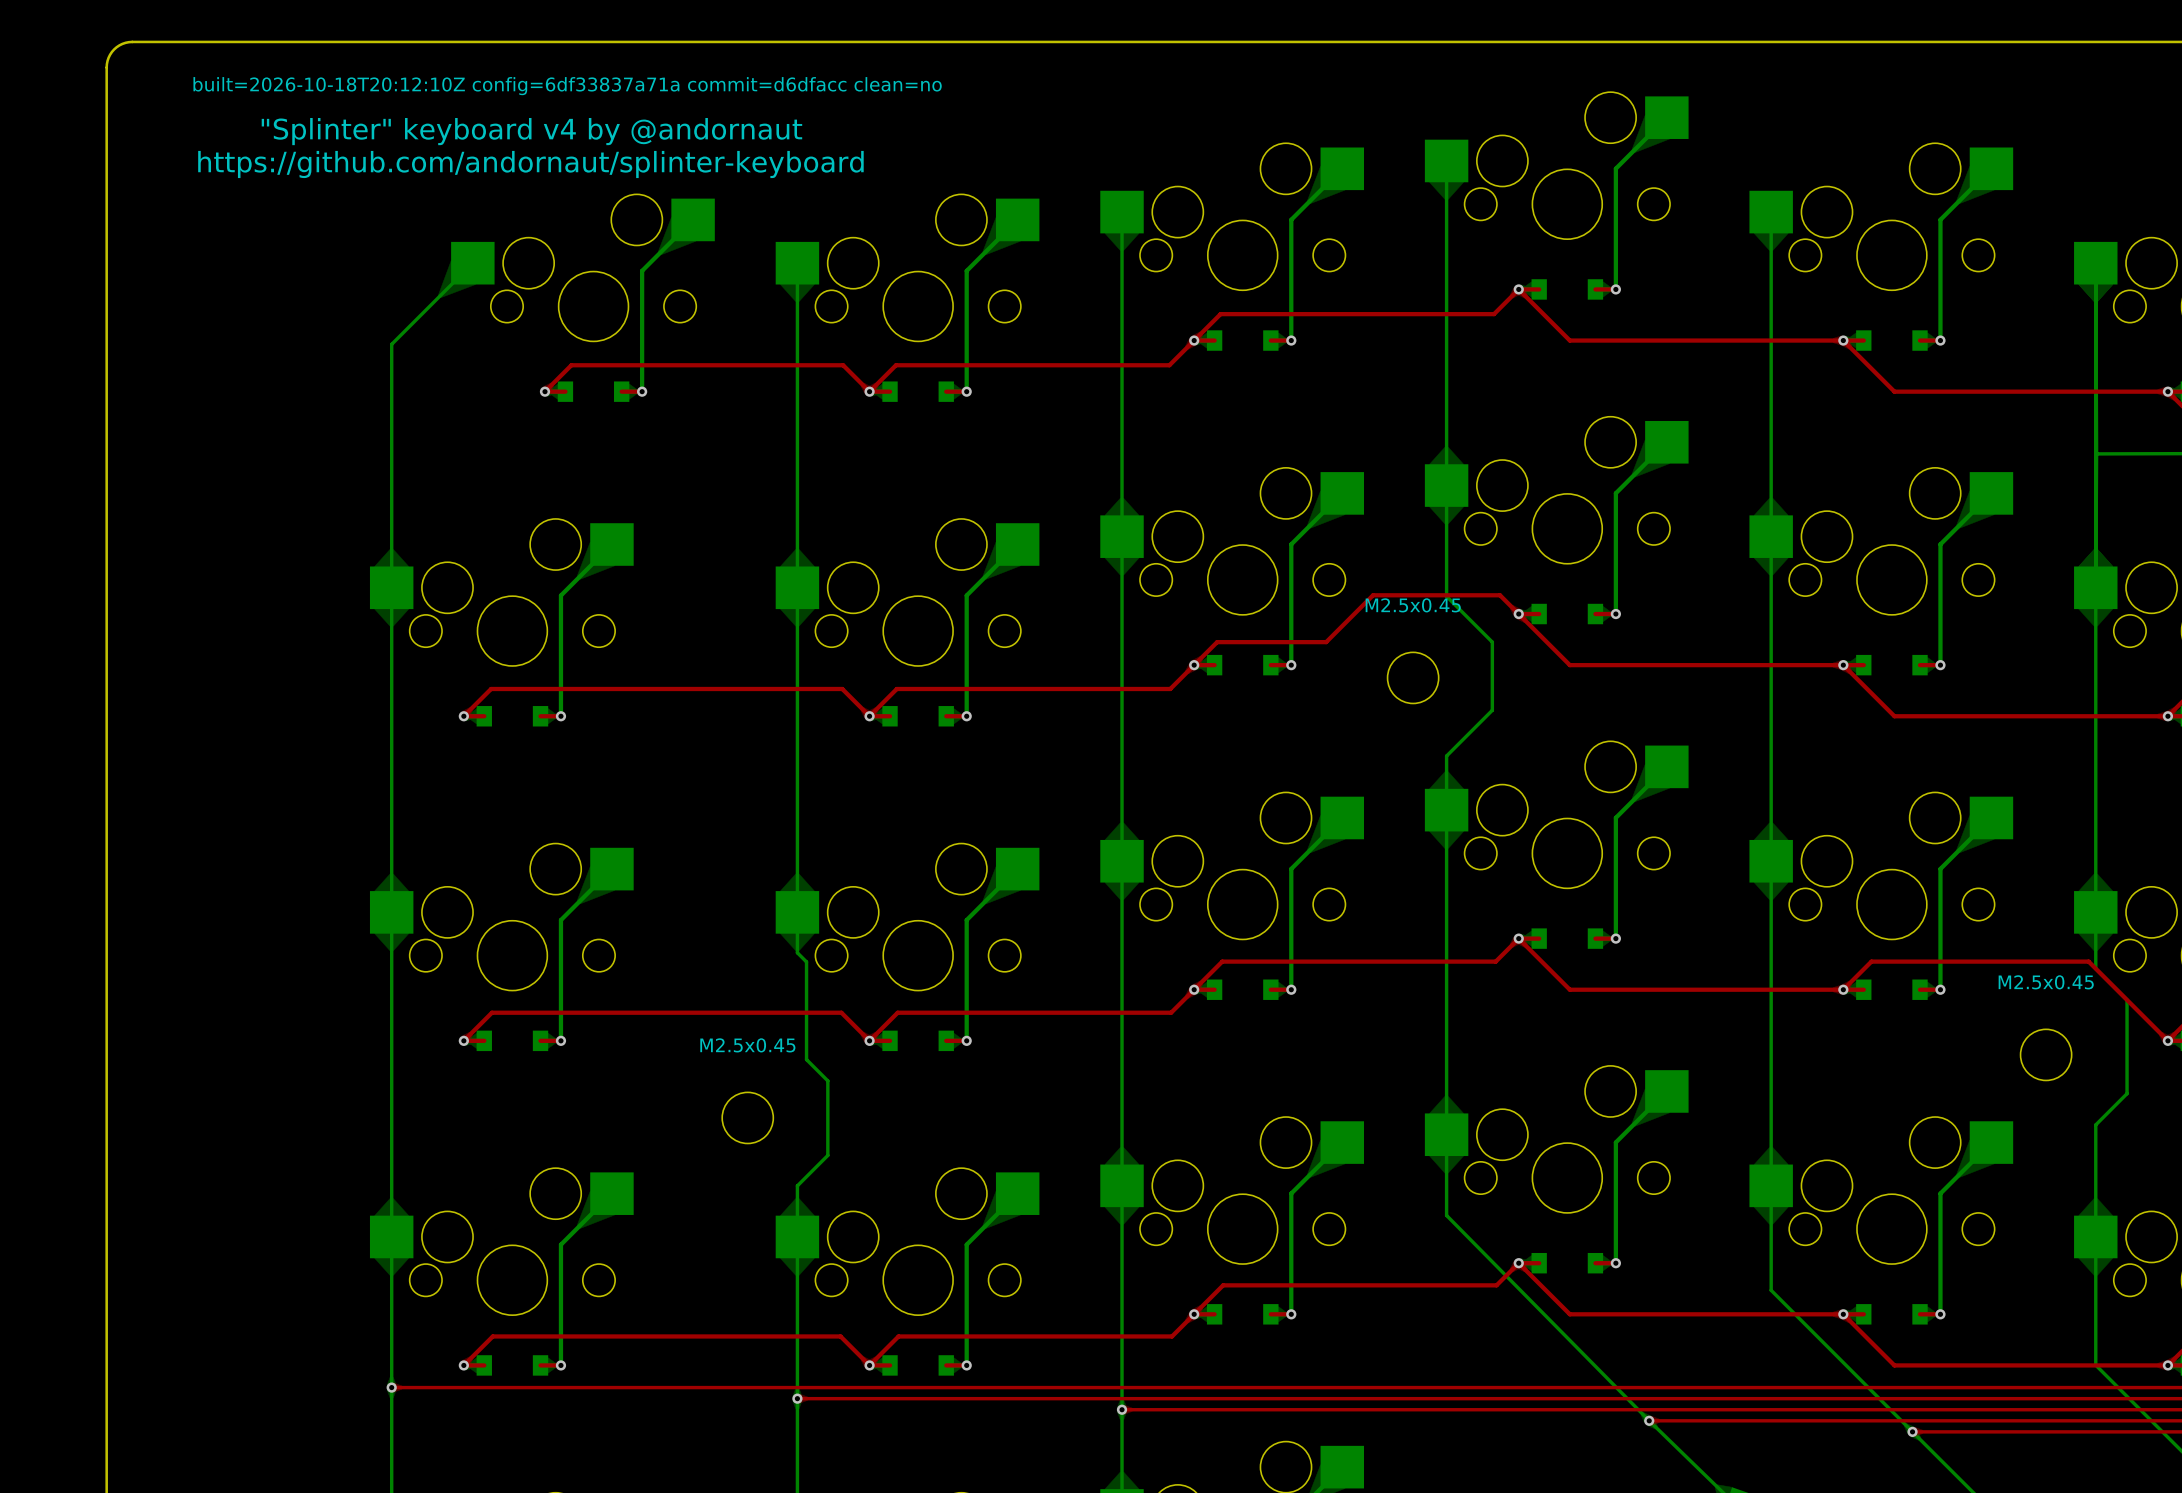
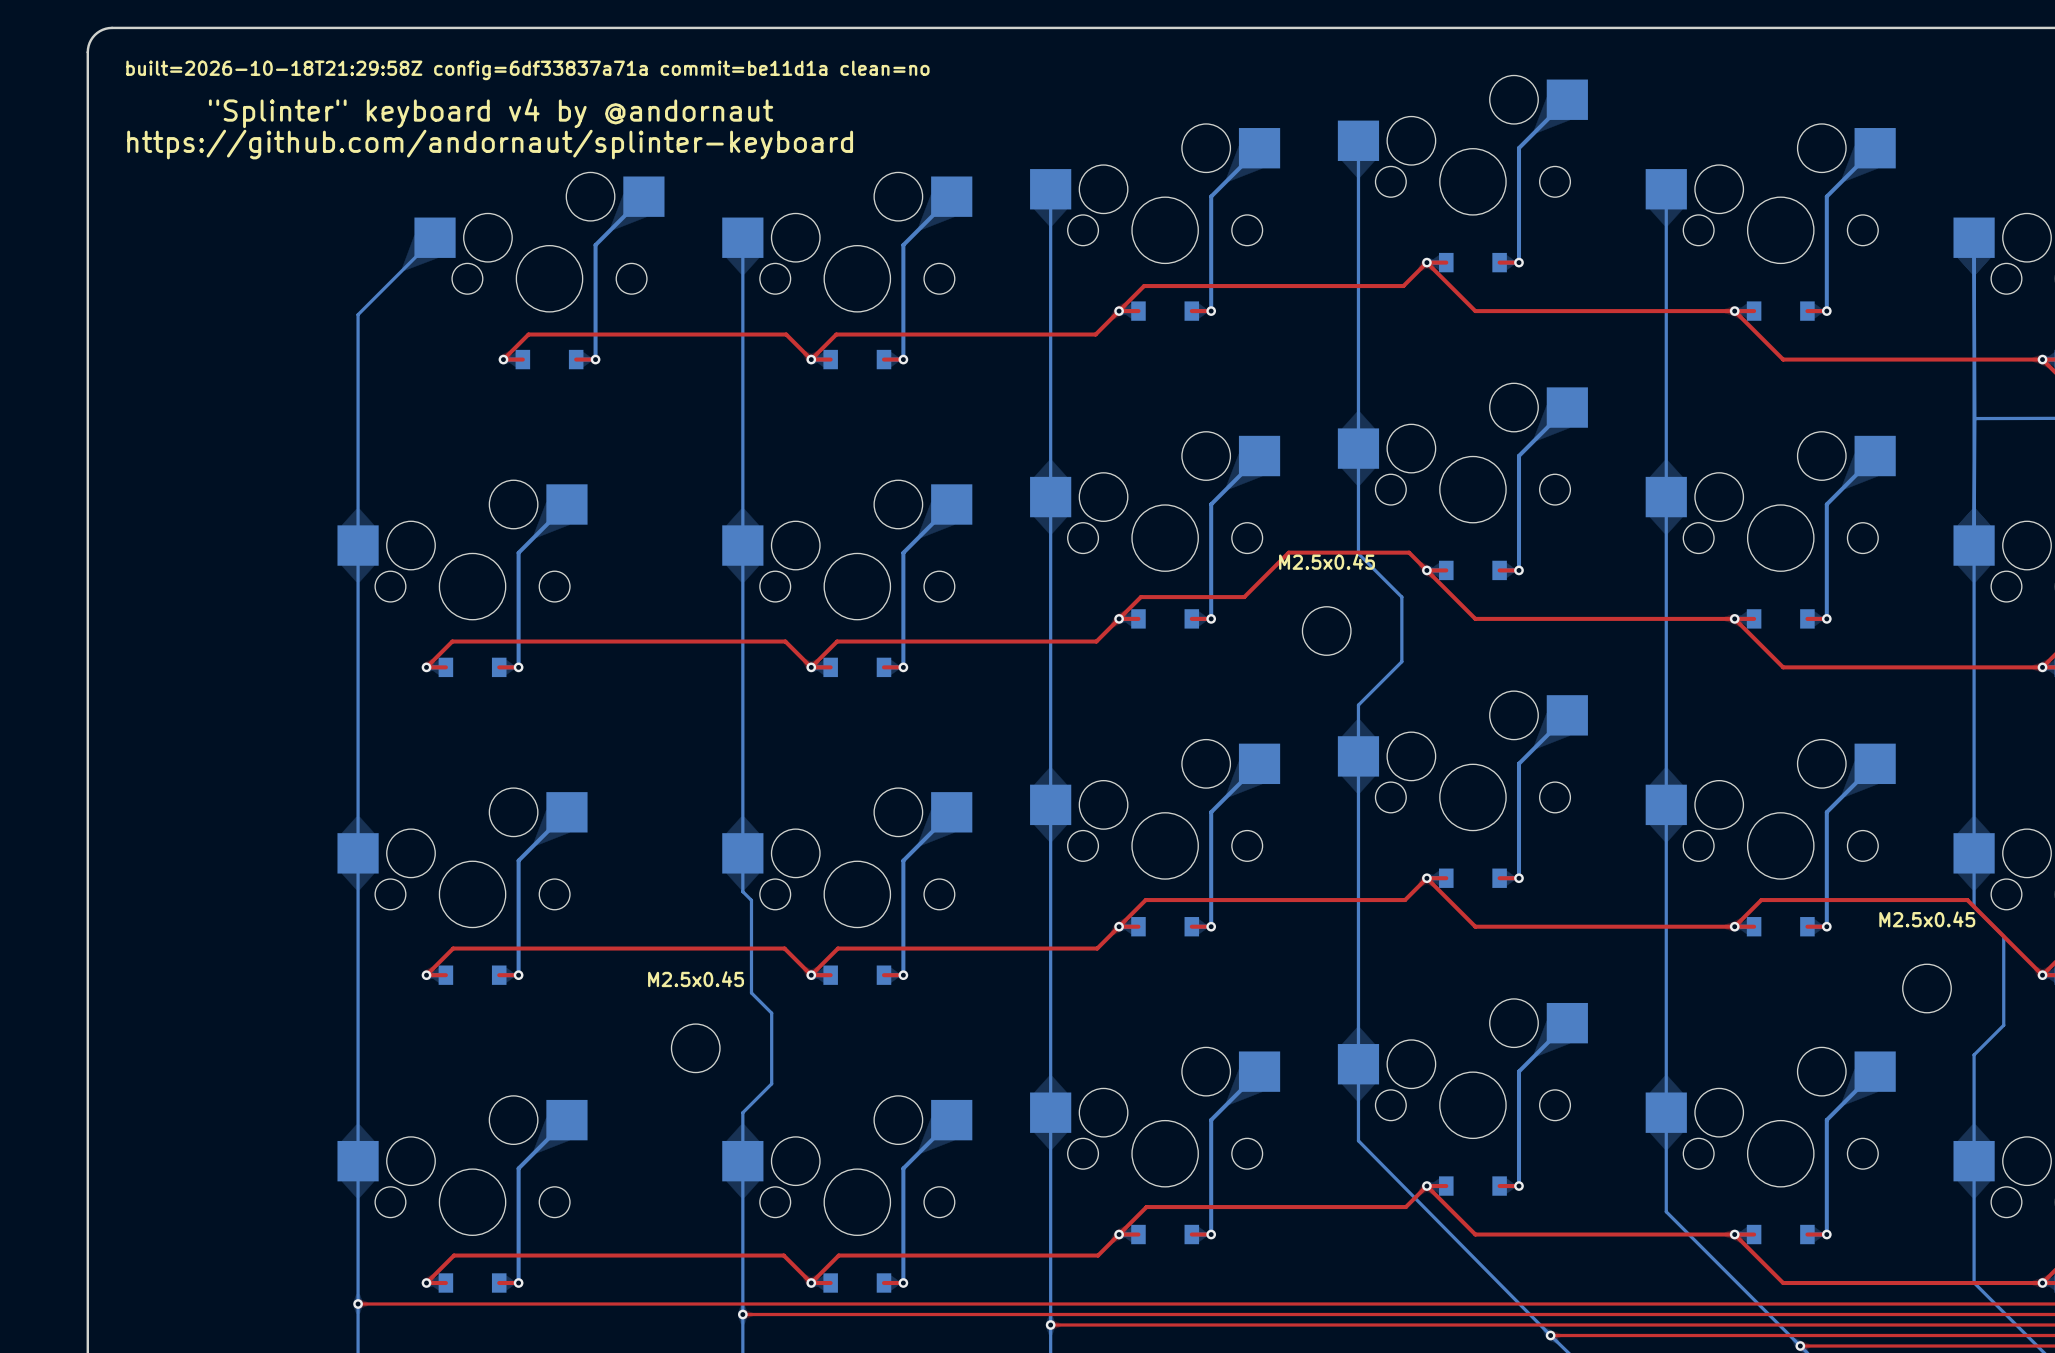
text: built=2026-10-18T20:12:10Z config=6df33837a71a commit=d6dfacc clean=no (567, 86) -> built=2026-10-18T21:29:58Z config=6df33837a71a commit=be11d1a clean=no (527, 70)

